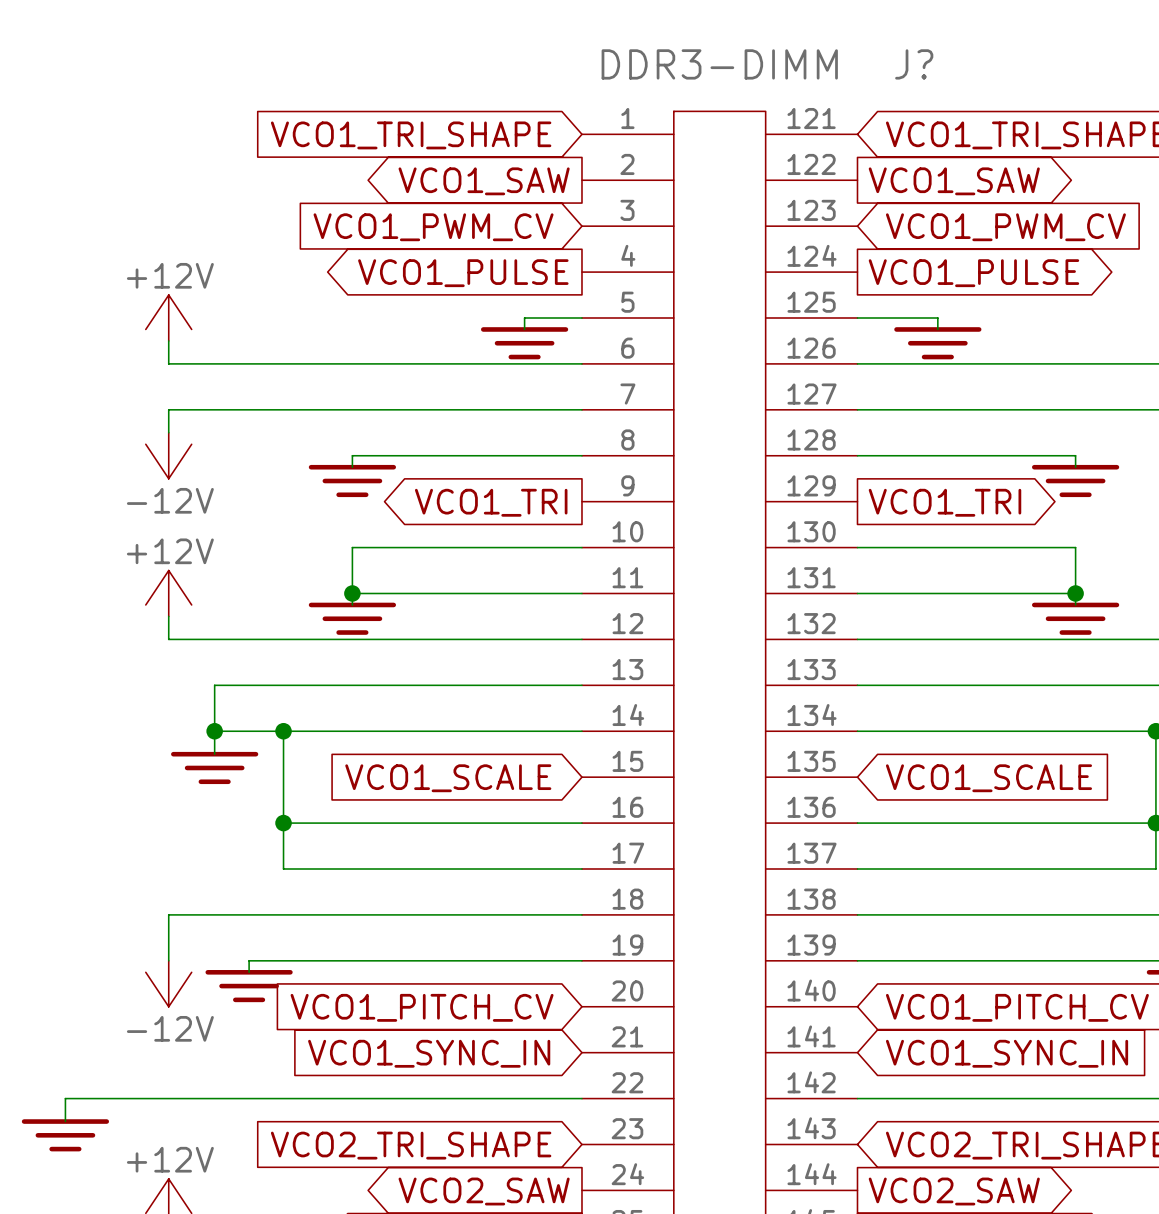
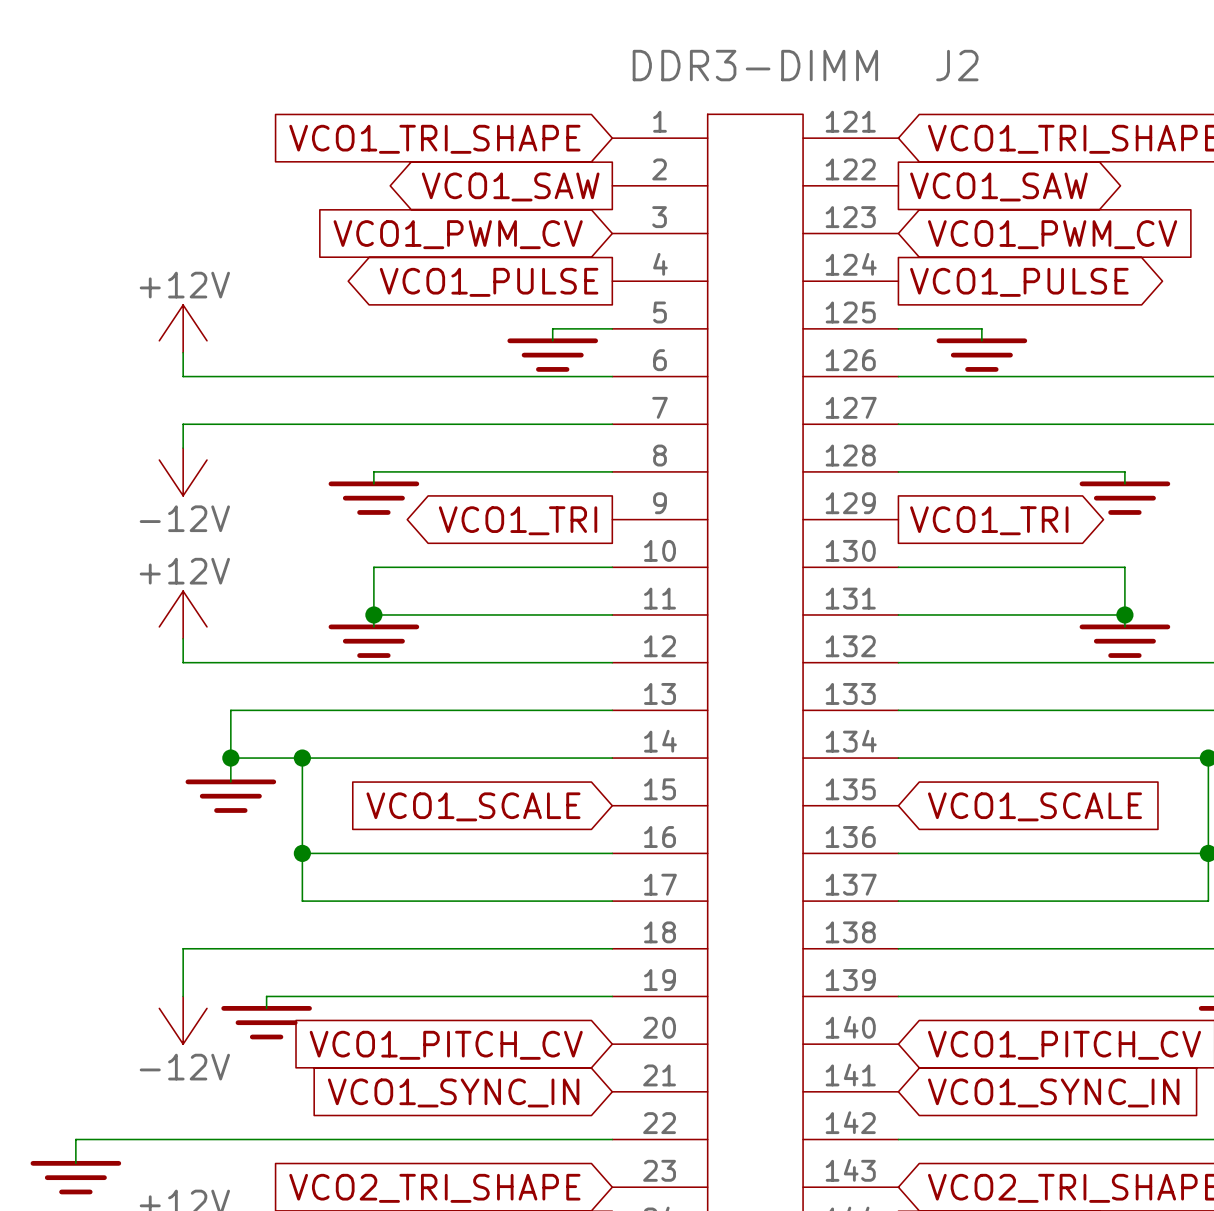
J? name: J? (914, 64) -> J2 (957, 65)

